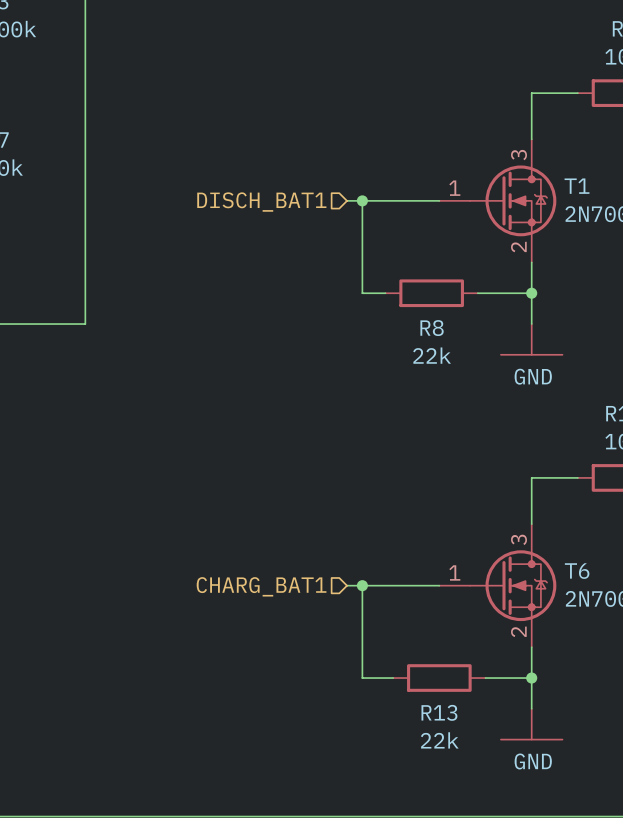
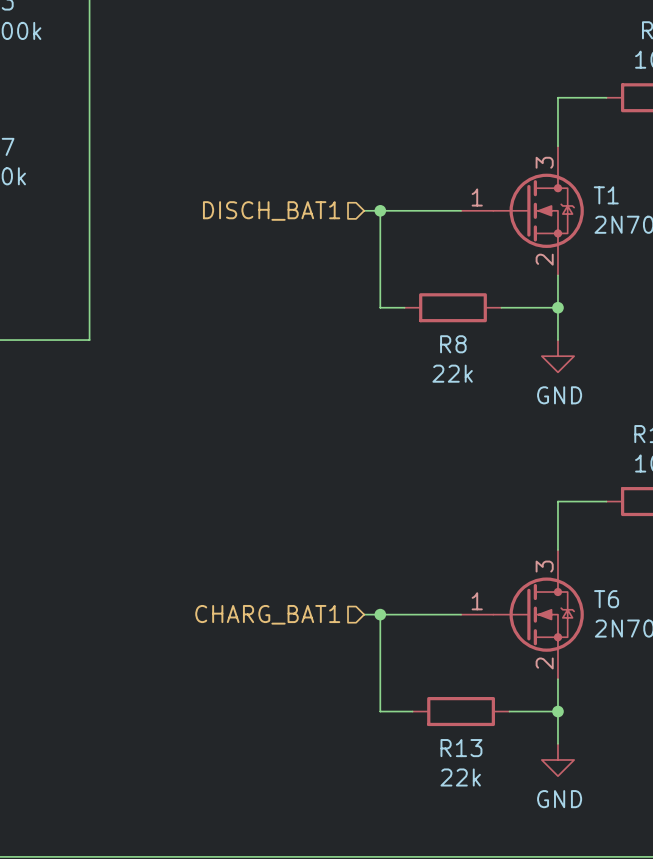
power symbol shape: [500, 324, 563, 355] -> [541, 340, 575, 373]
power symbol shape: [500, 708, 563, 740] -> [541, 743, 575, 777]

